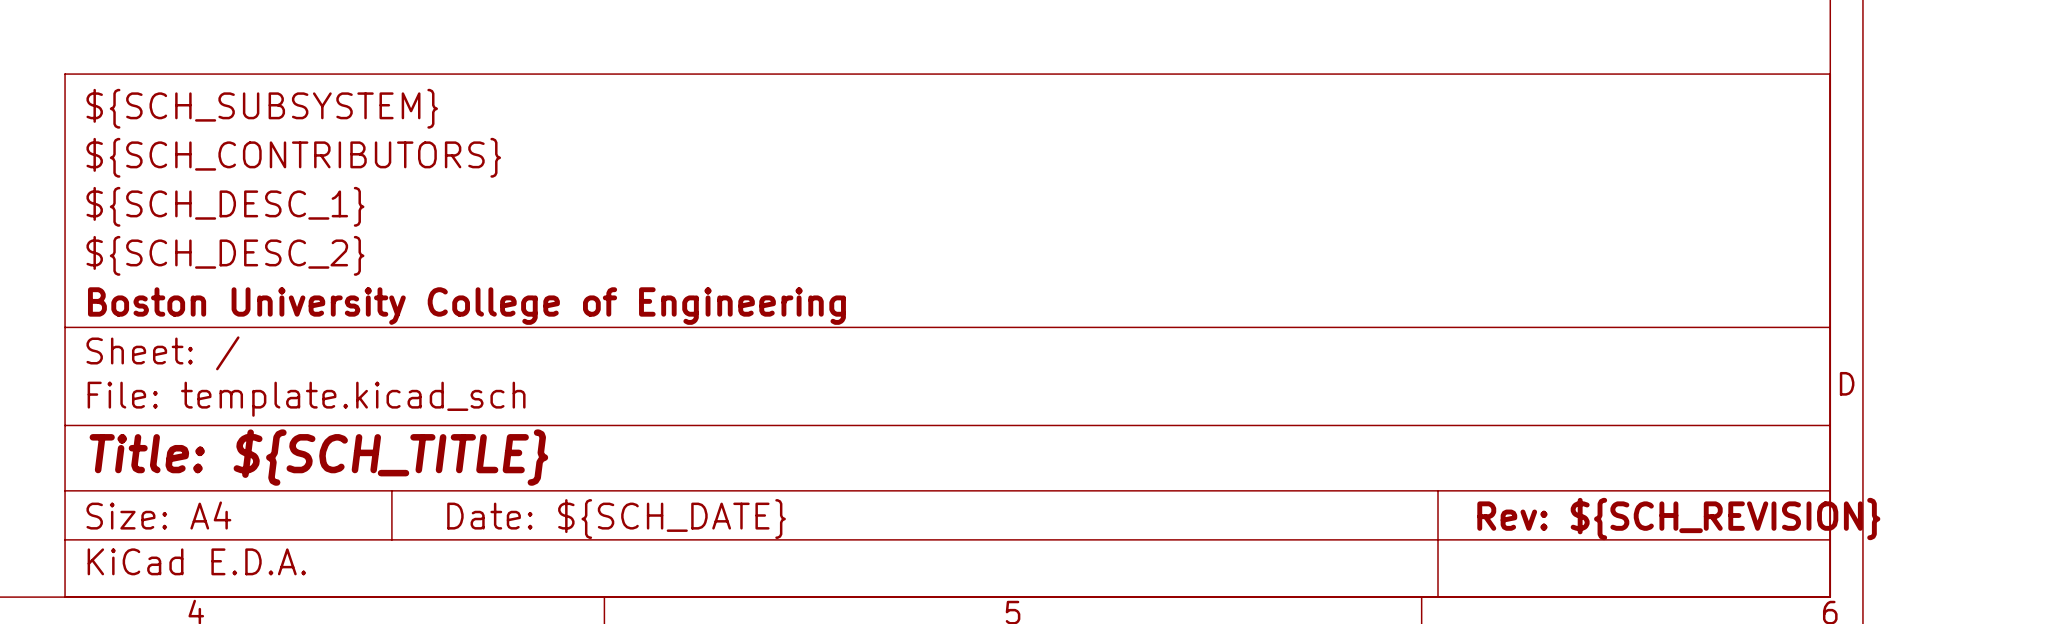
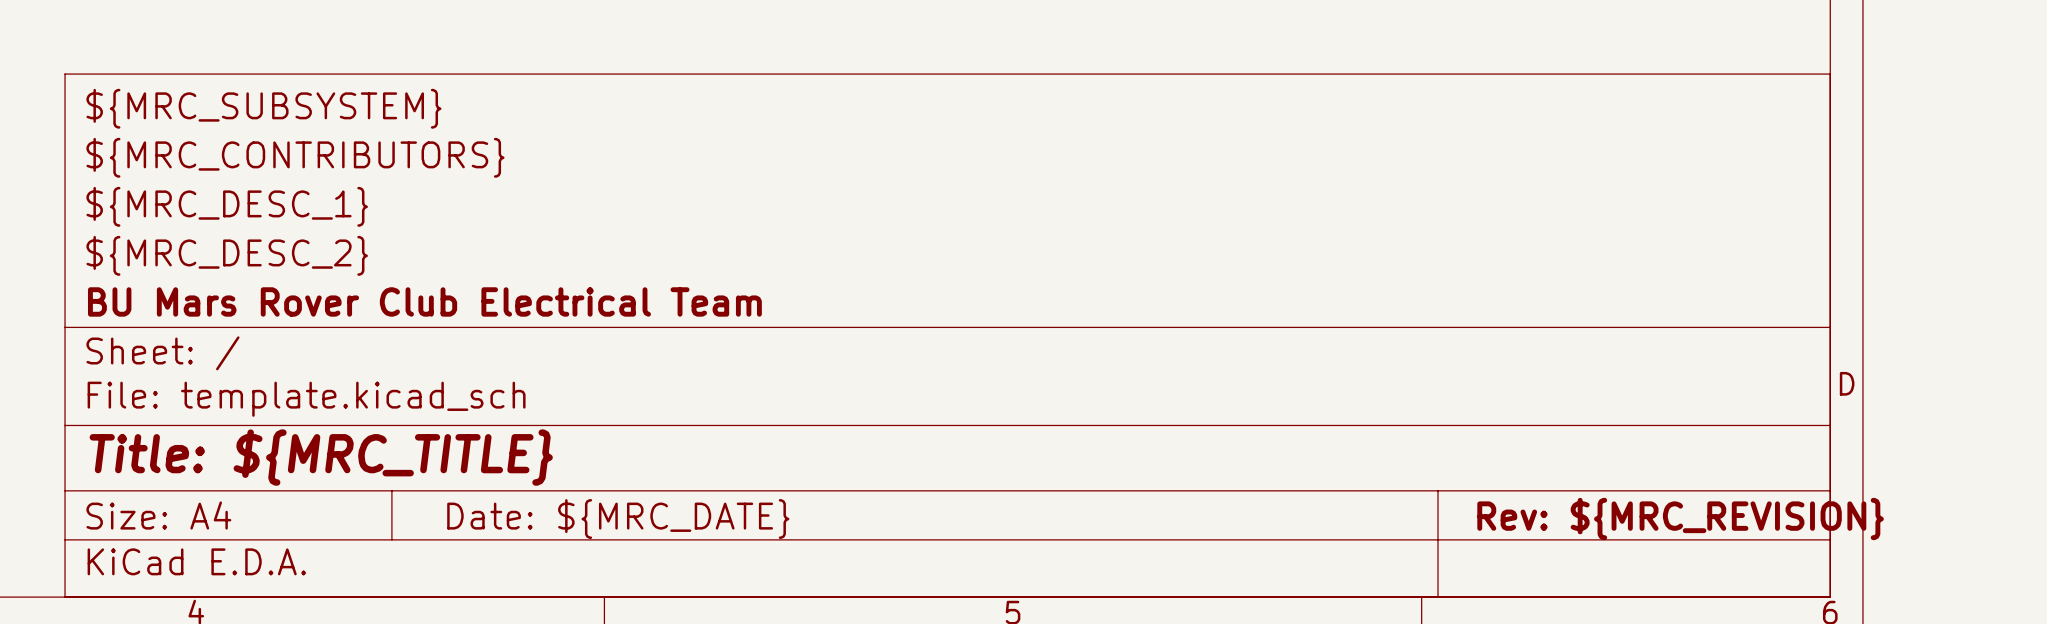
title block: ${SCH_SUBSYSTEM} (262, 108) -> ${MRC_SUBSYSTEM} (263, 108)
title block: ${SCH_CONTRIBUTORS} (293, 157) -> ${MRC_CONTRIBUTORS} (295, 157)
title block: ${SCH_DESC_1} (225, 206) -> ${MRC_DESC_1} (227, 206)
title block: ${SCH_DESC_2} (225, 255) -> ${MRC_DESC_2} (227, 255)
title block: Boston University College of Engineering (466, 306) -> BU Mars Rover Club Electrical Team (424, 301)
title block: Title: ${SCH_TITLE} (318, 457) -> Title: ${MRC_TITLE} (321, 457)
title block: Date: ${SCH_DATE} (616, 519) -> Date: ${MRC_DATE} (618, 519)
title block: Rev: ${SCH_REVISION} (1678, 519) -> Rev: ${MRC_REVISION} (1680, 519)

